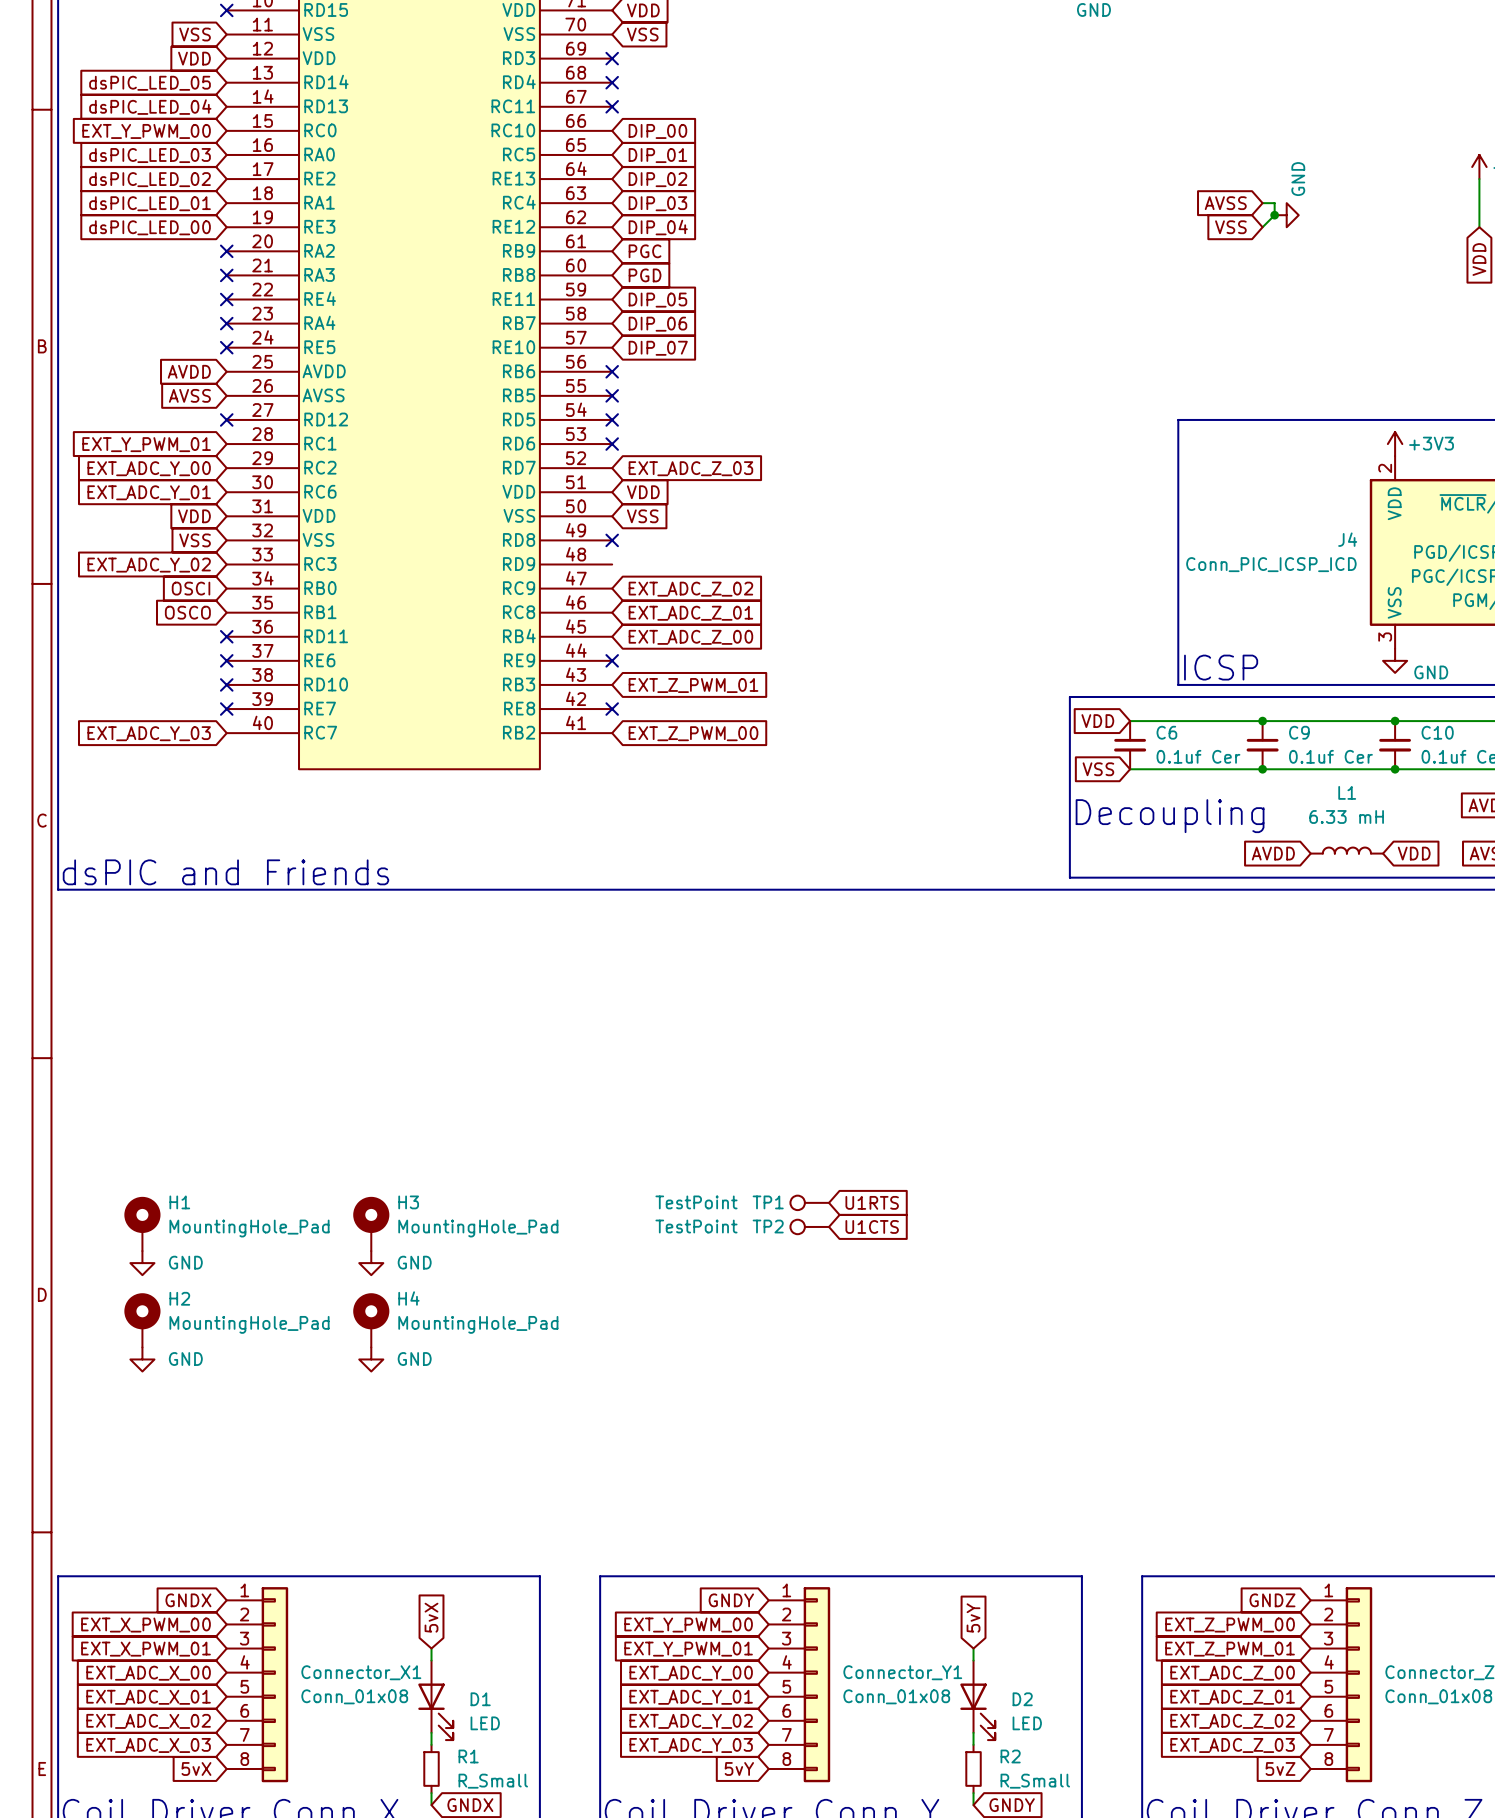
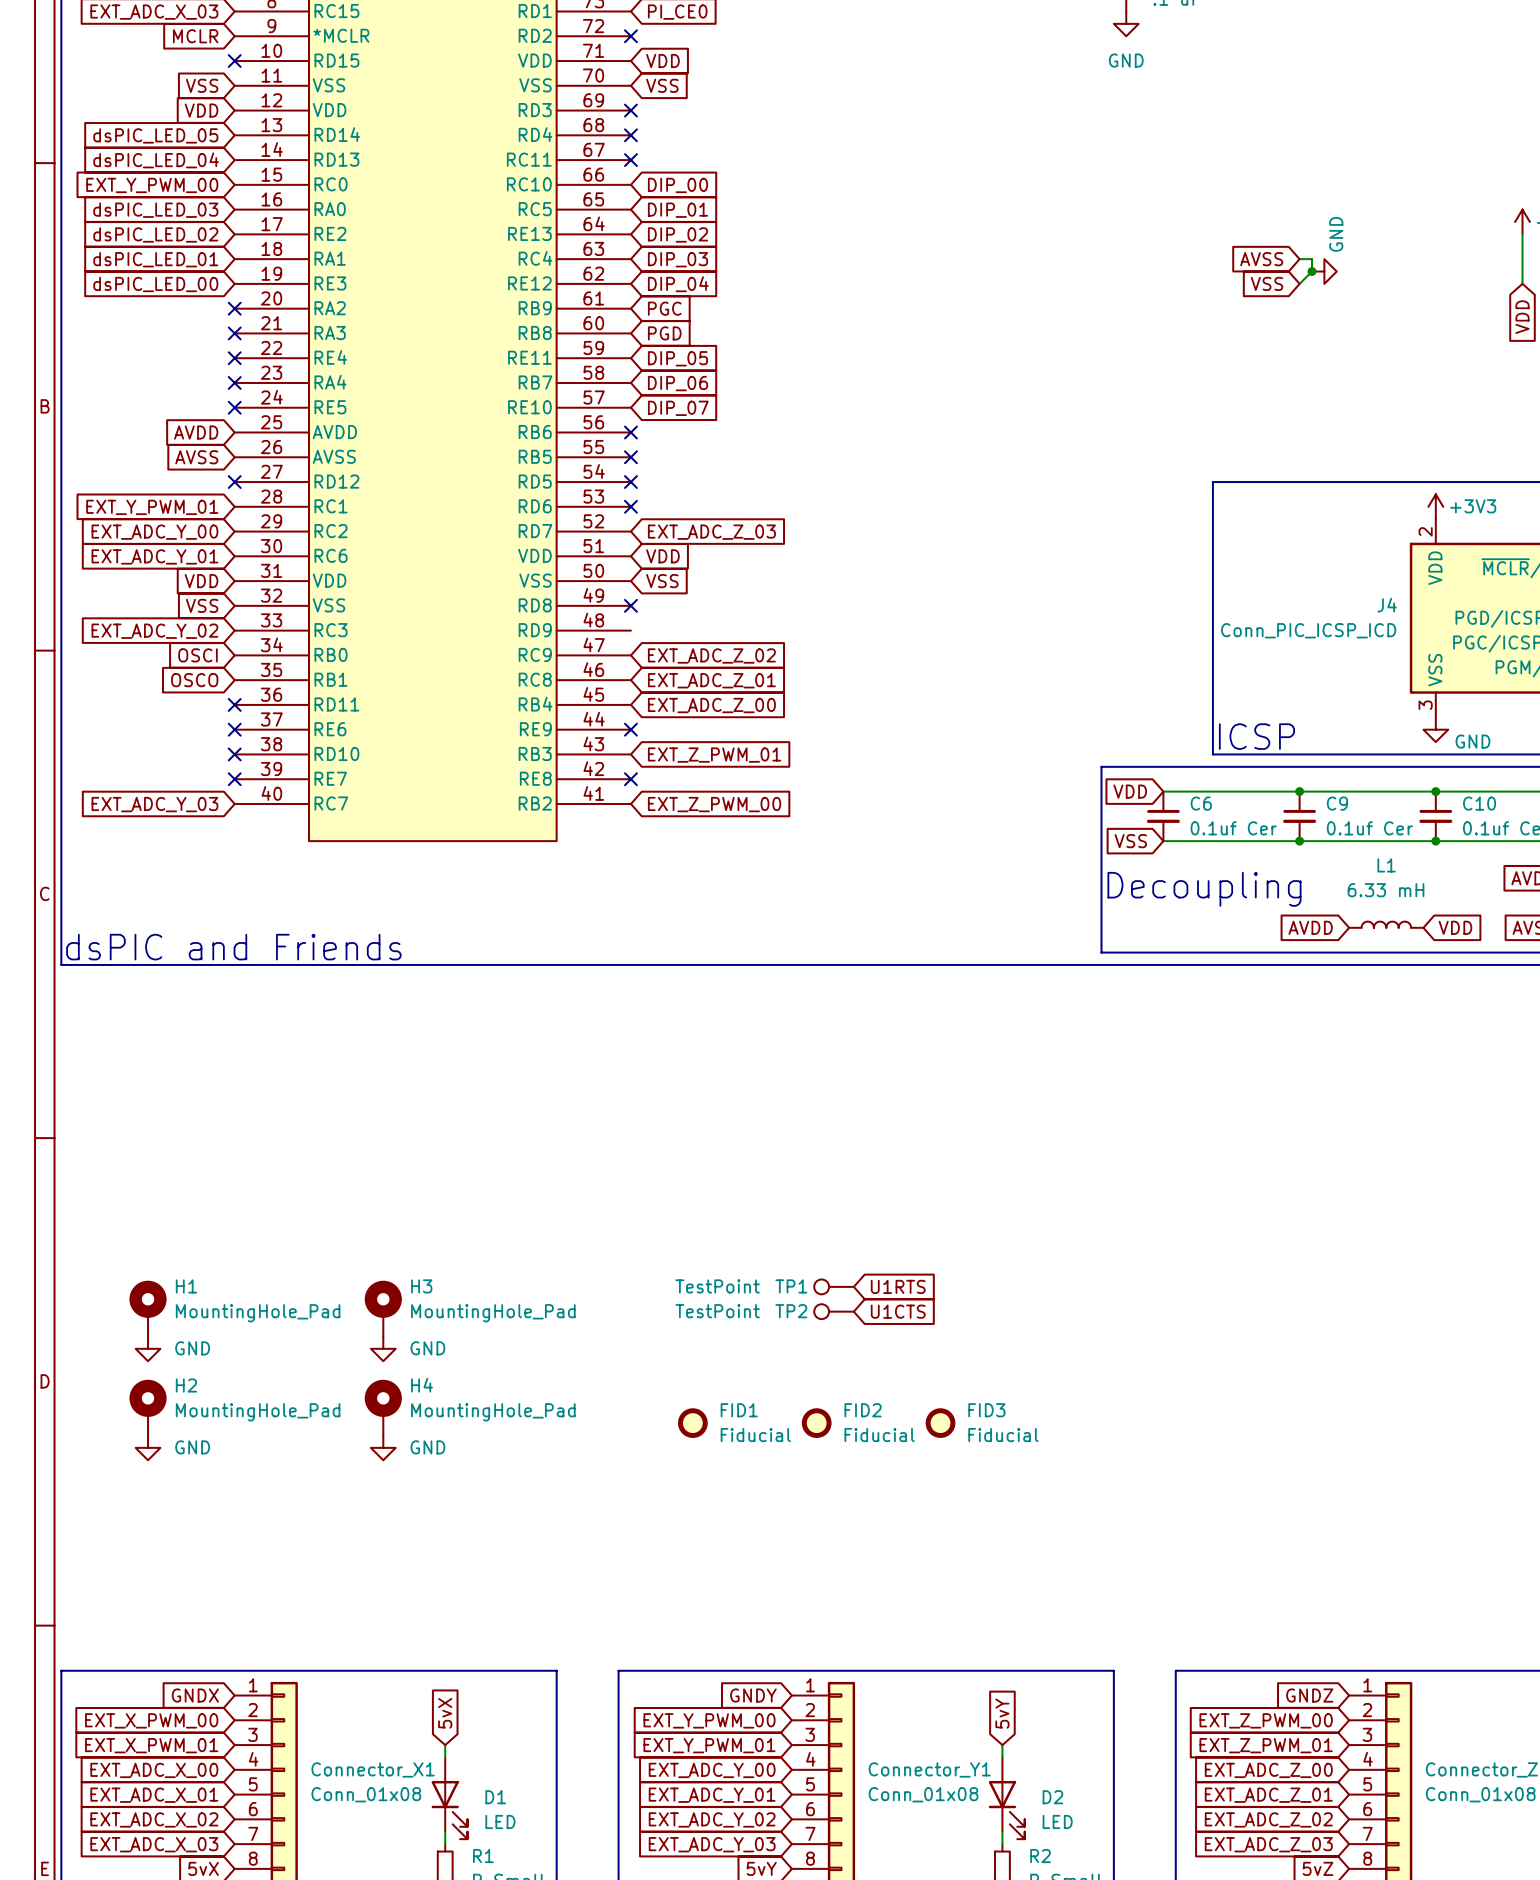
FID1: none -> Fiducial (692, 1423)
FID2: none -> Fiducial (816, 1423)
FID3: none -> Fiducial (940, 1423)

